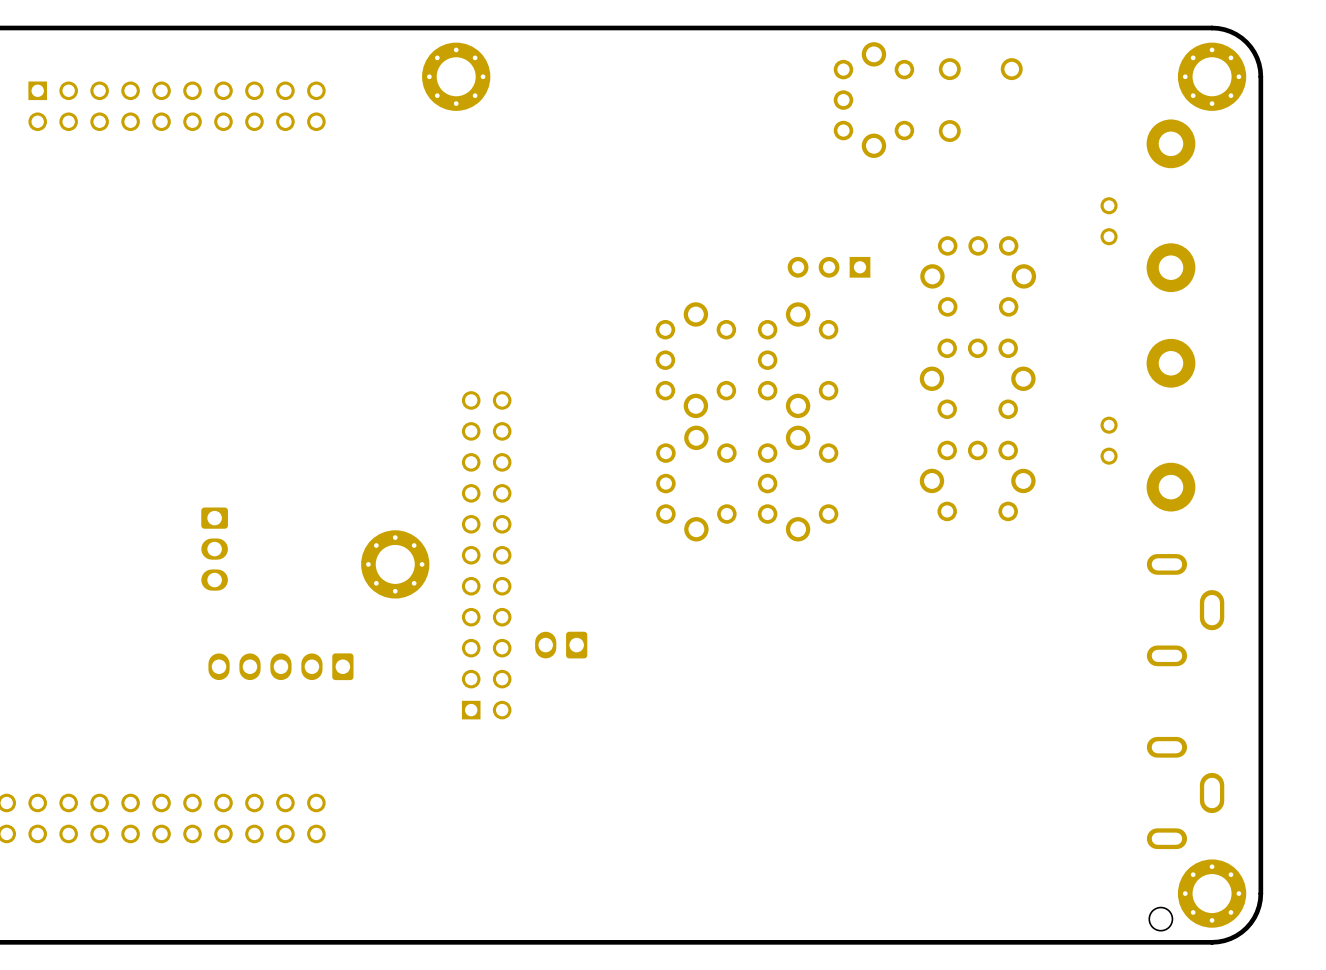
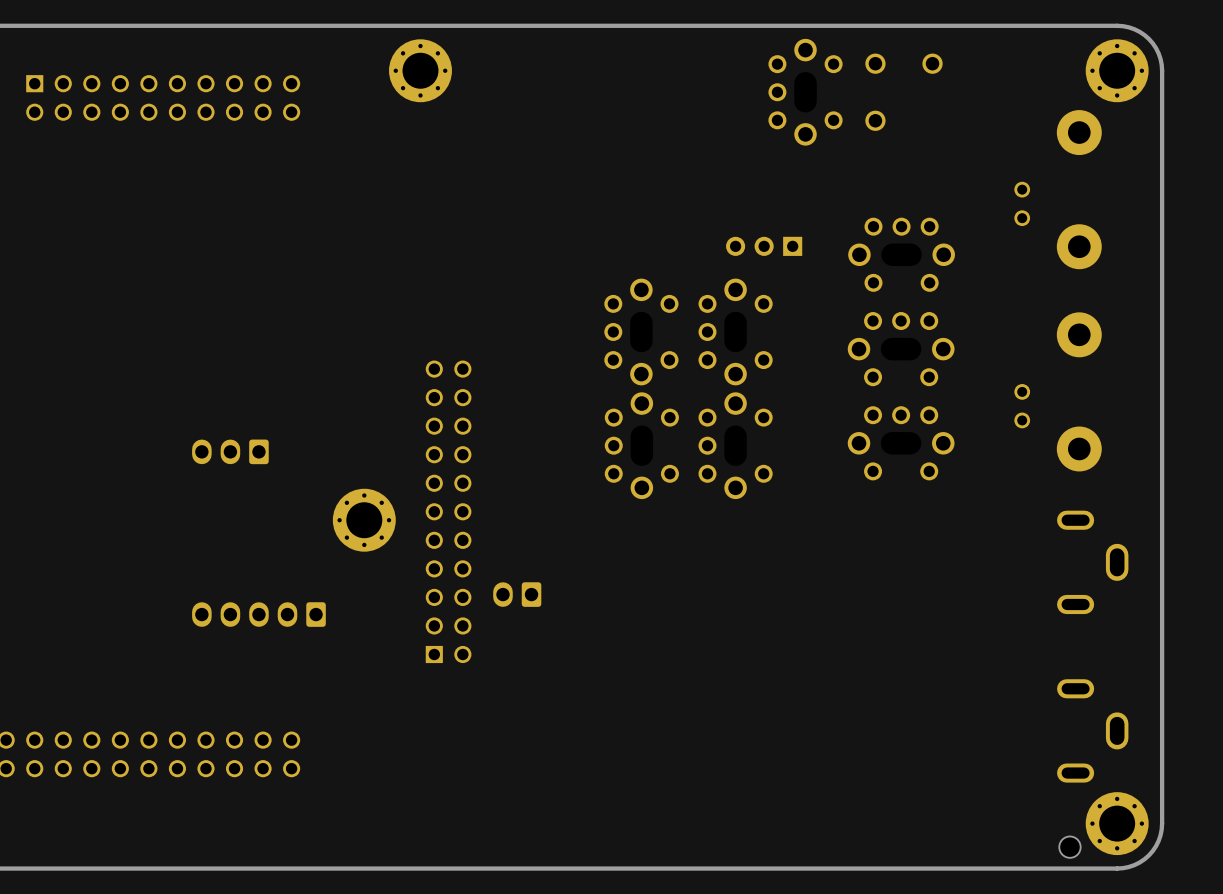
part rotation: 0° (214, 549) -> 90° clockwise (230, 451)
part position: (214, 549) -> (230, 451)

